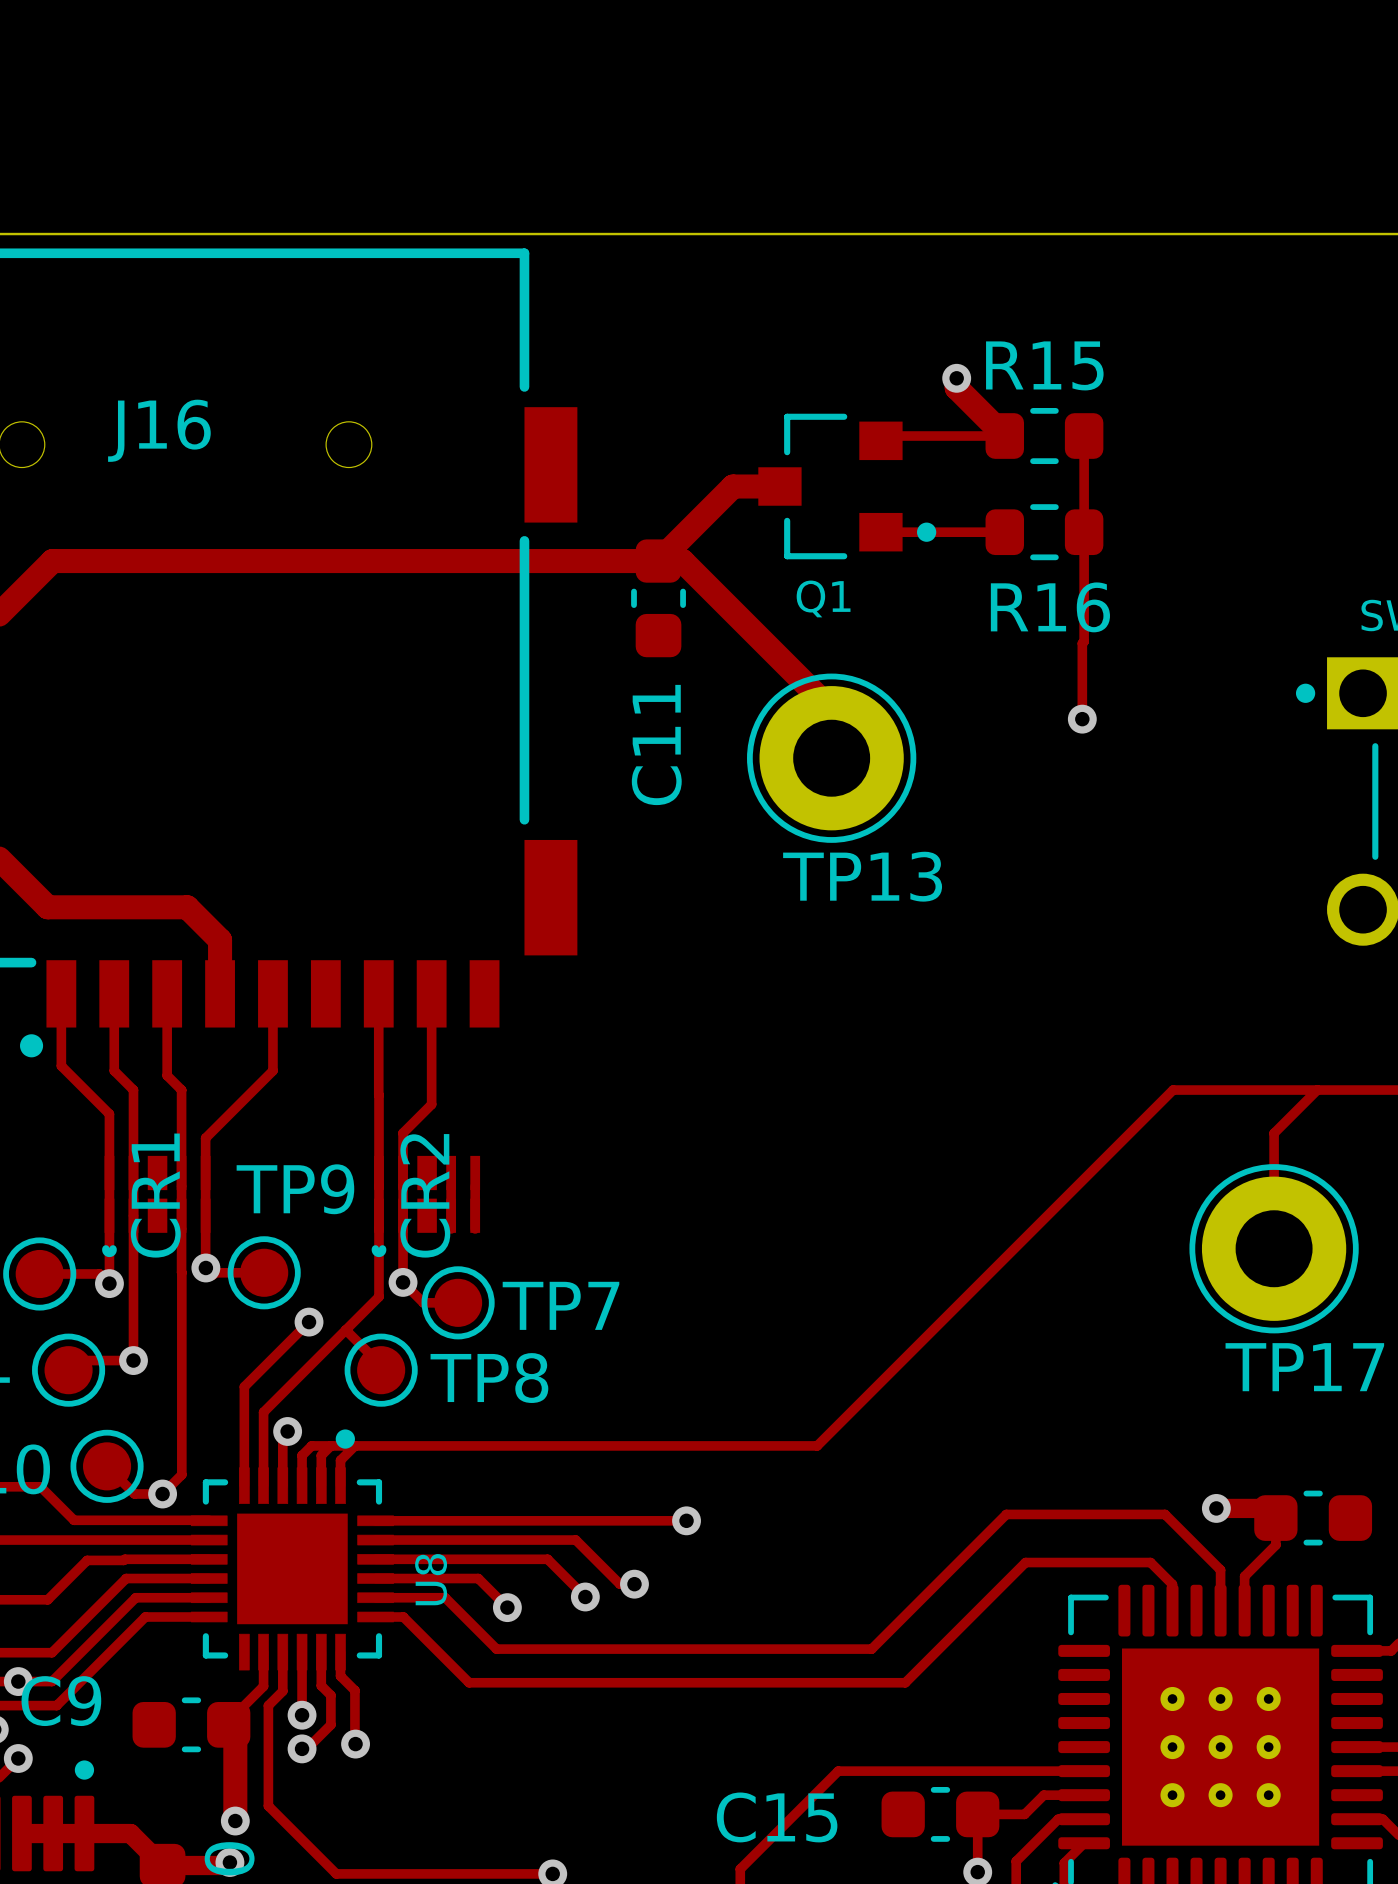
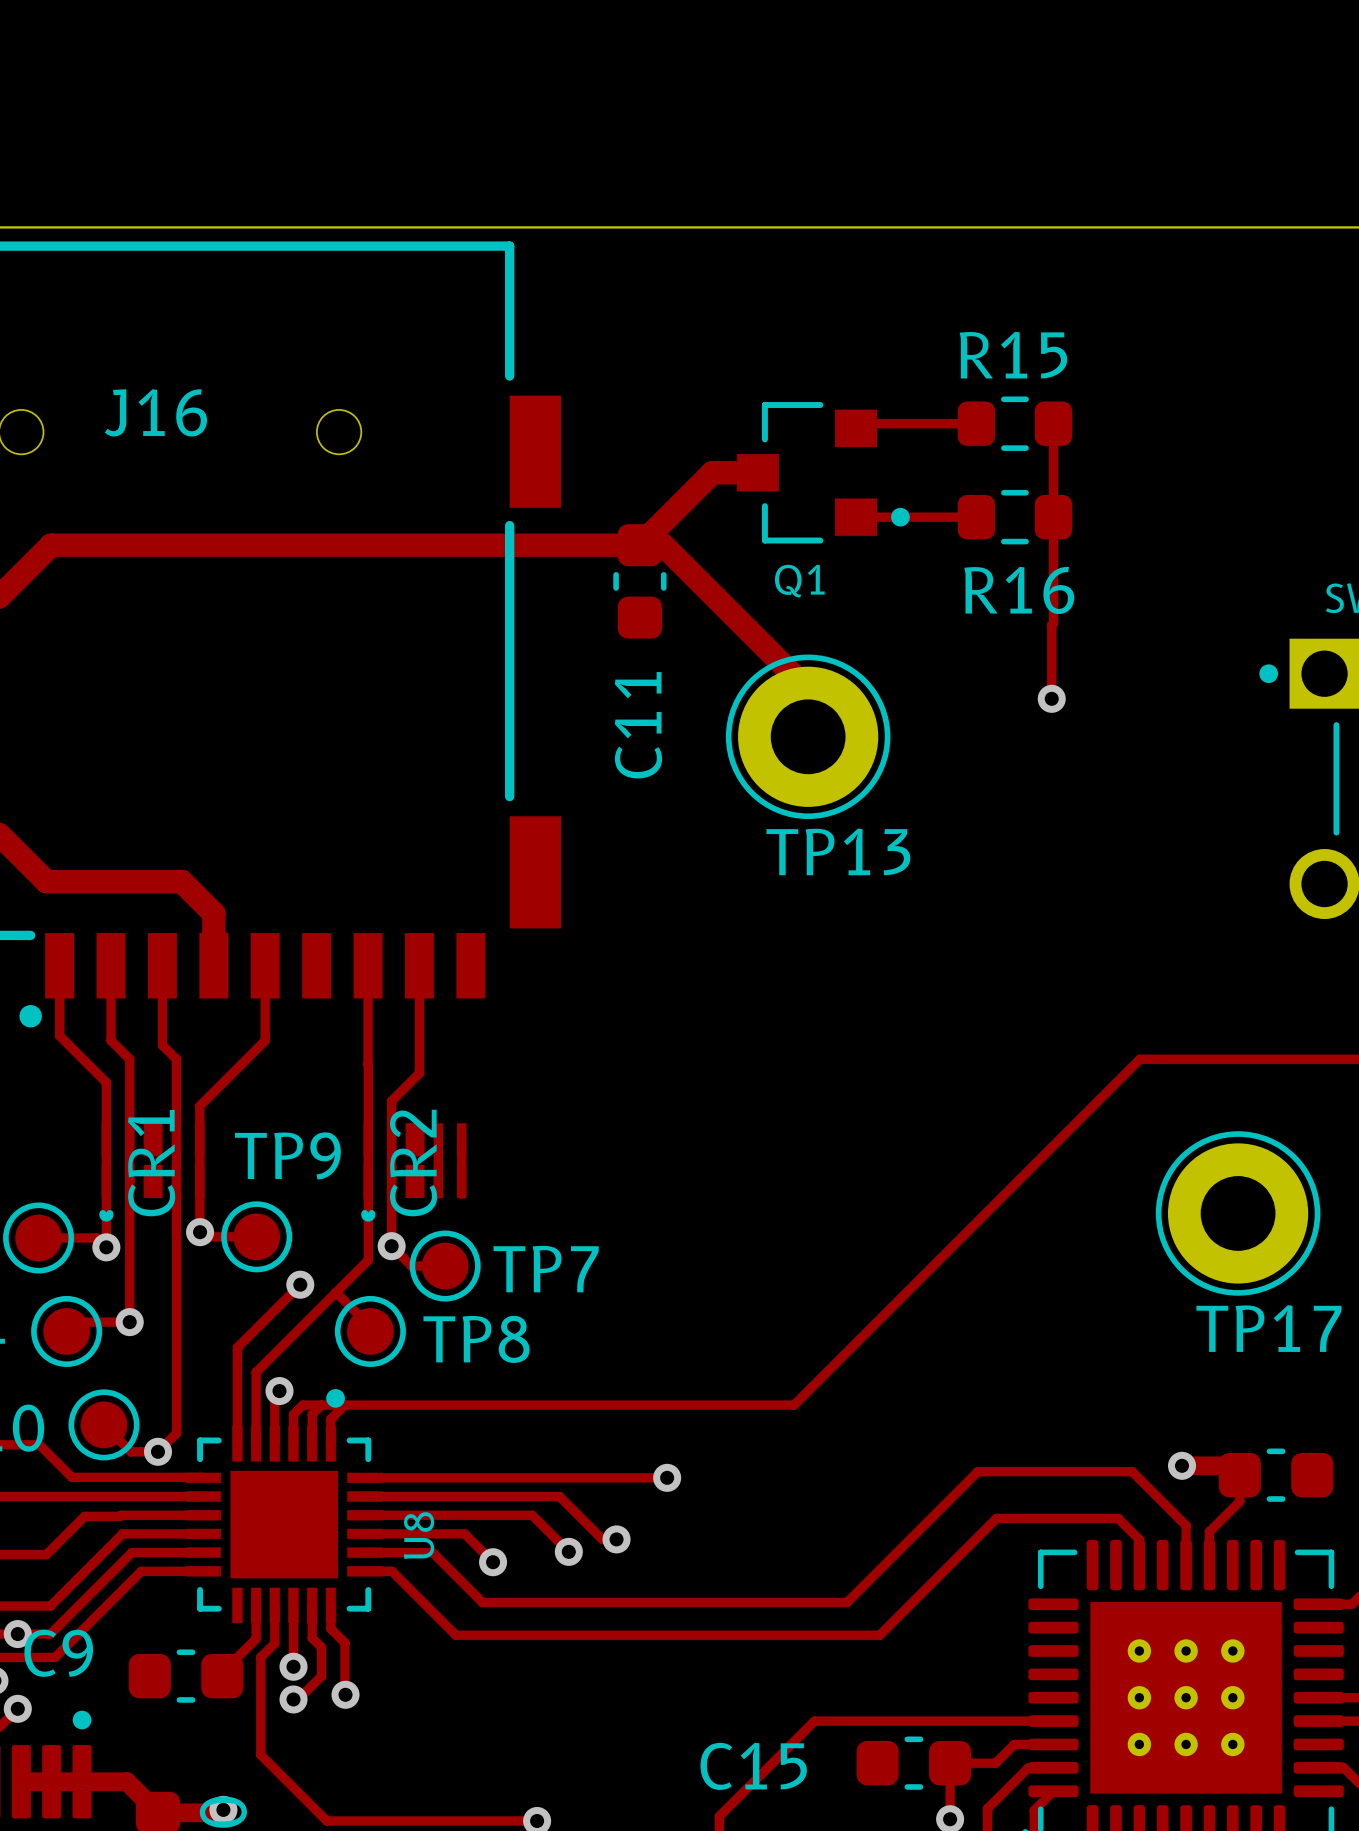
track: (956, 378) (956, 387) (1004, 436) -> none
via: (956, 378) -> none
track: (1317, 1090) (1274, 1133) (1274, 1248) -> none
track: (228, 1724) (235, 1731) (235, 1821) -> none
via: (235, 1821) -> none

